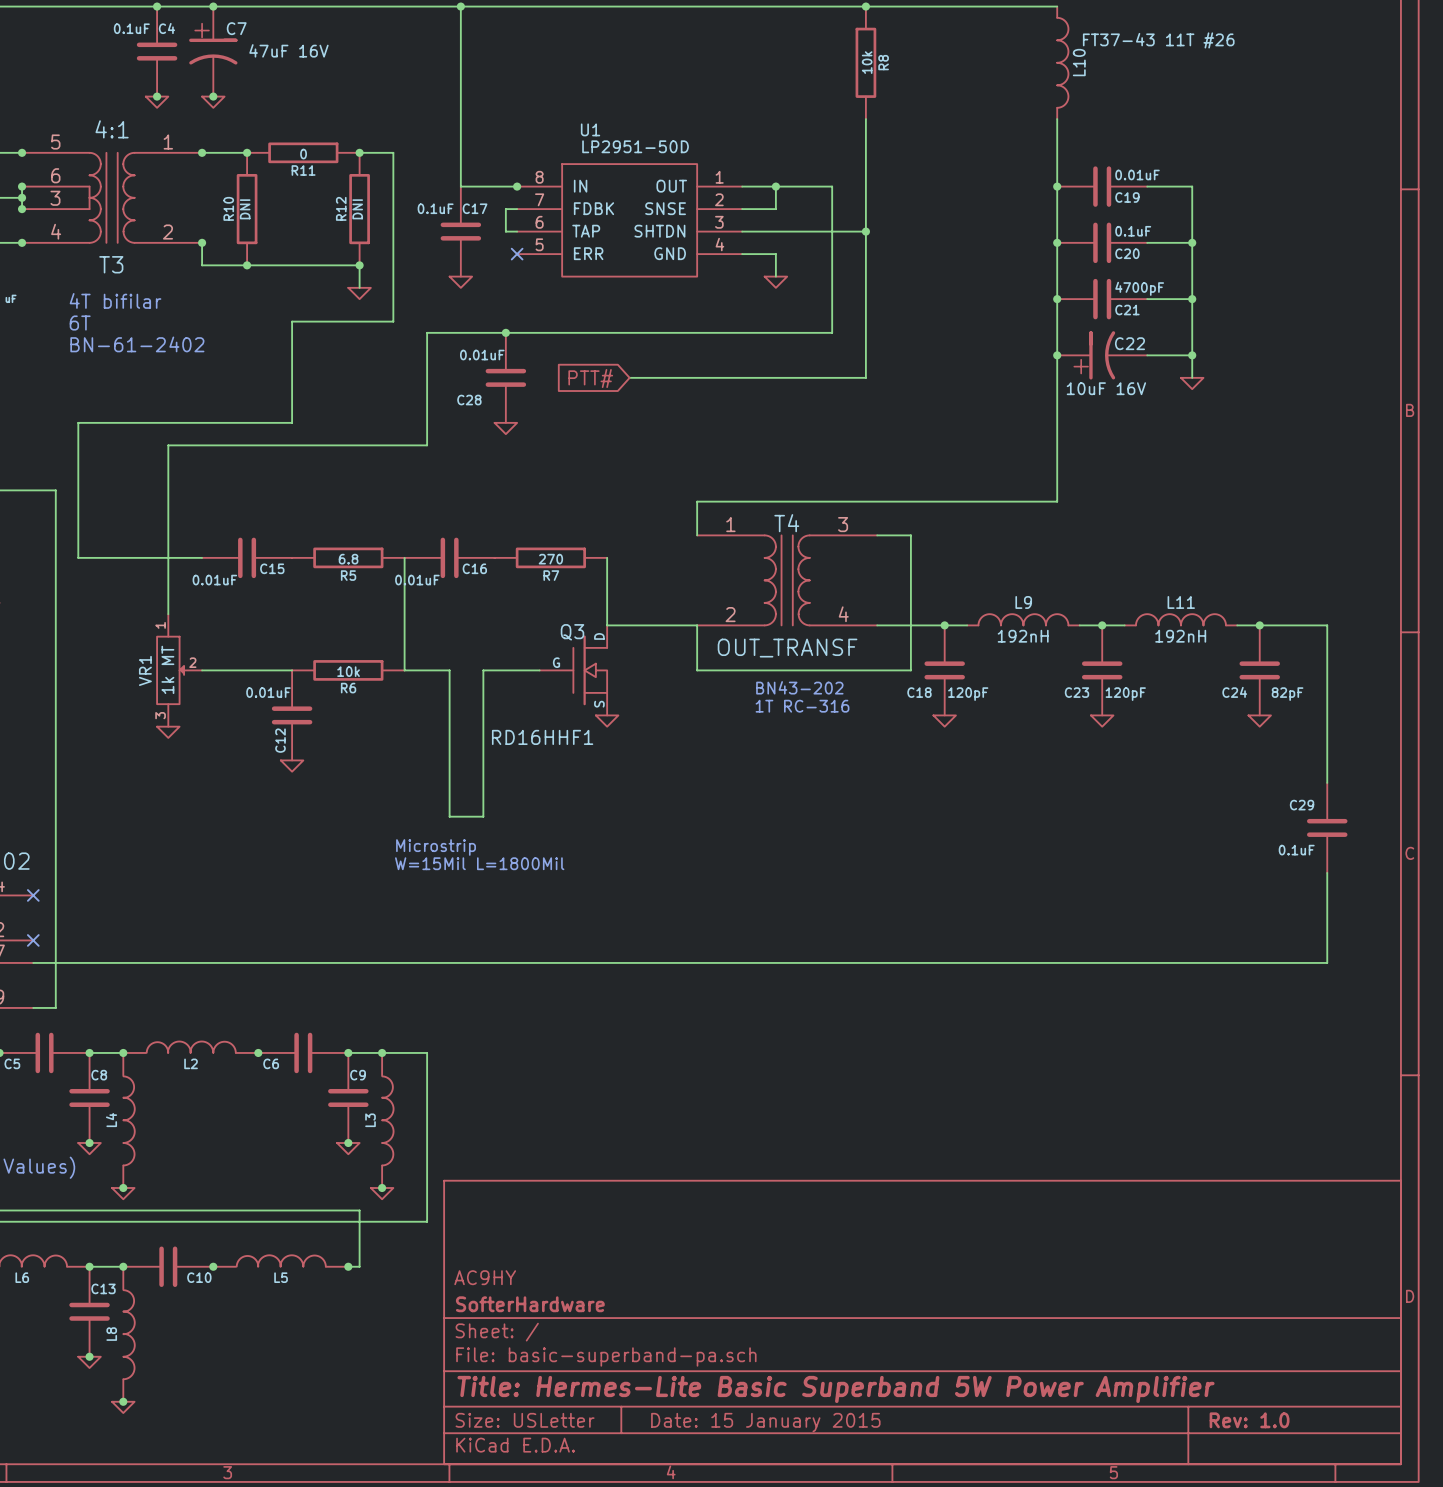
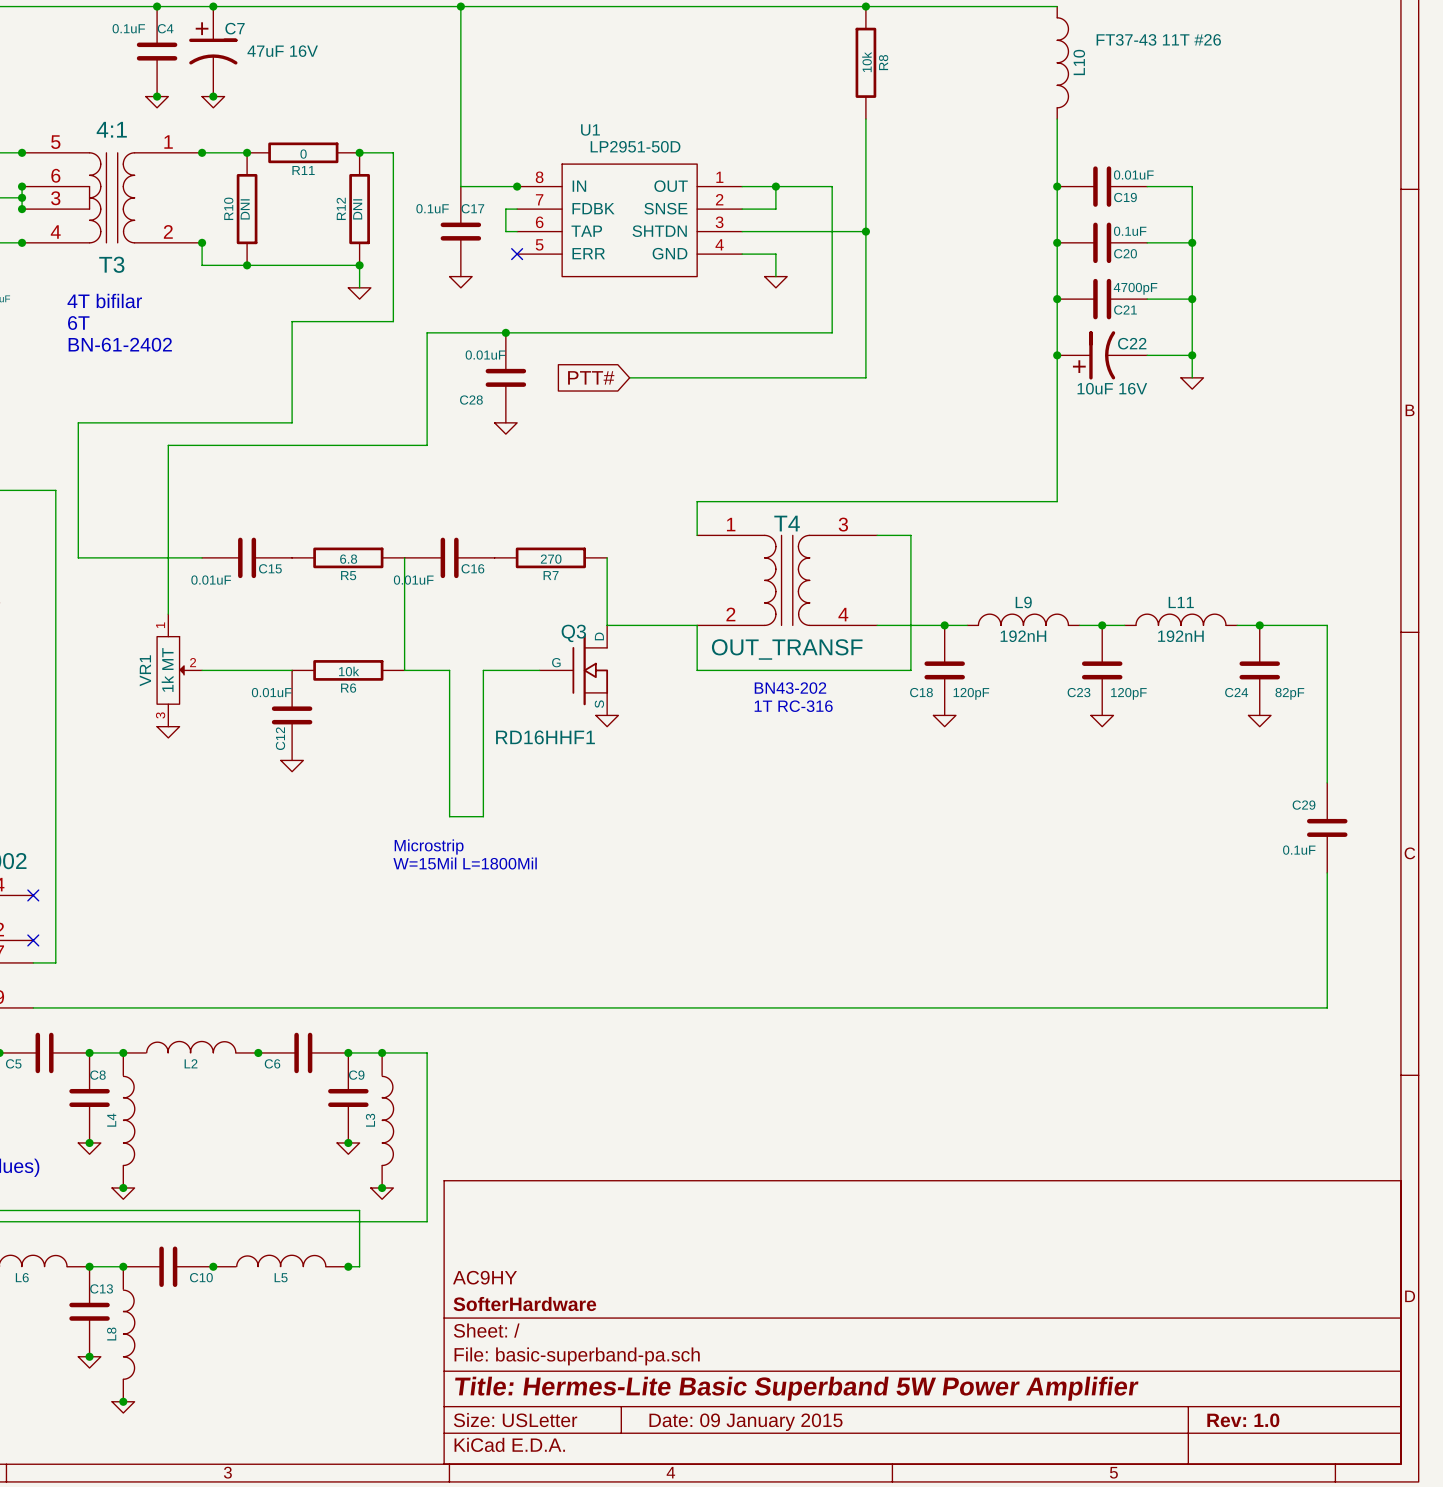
wire: (1327, 962) (55, 962) (55, 1007) -> (1327, 962) (1327, 1007) (55, 1007)
title block: Date: 15 January 2015 (765, 1422) -> Date: 09 January 2015 (746, 1422)

